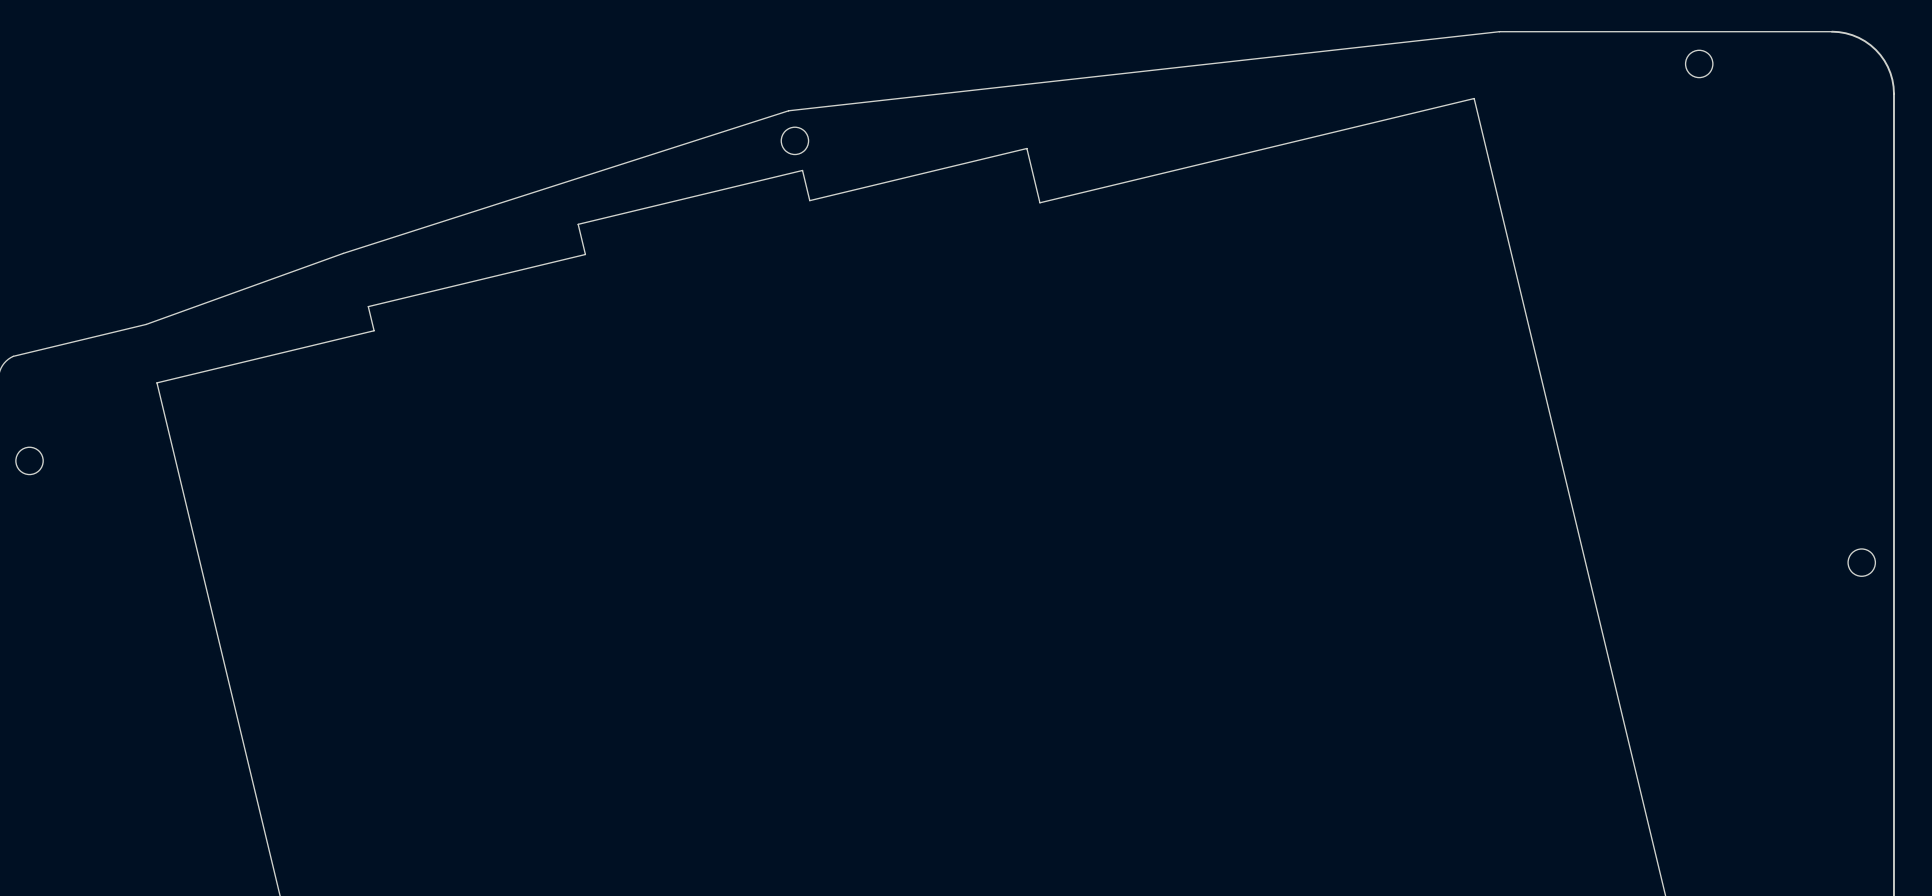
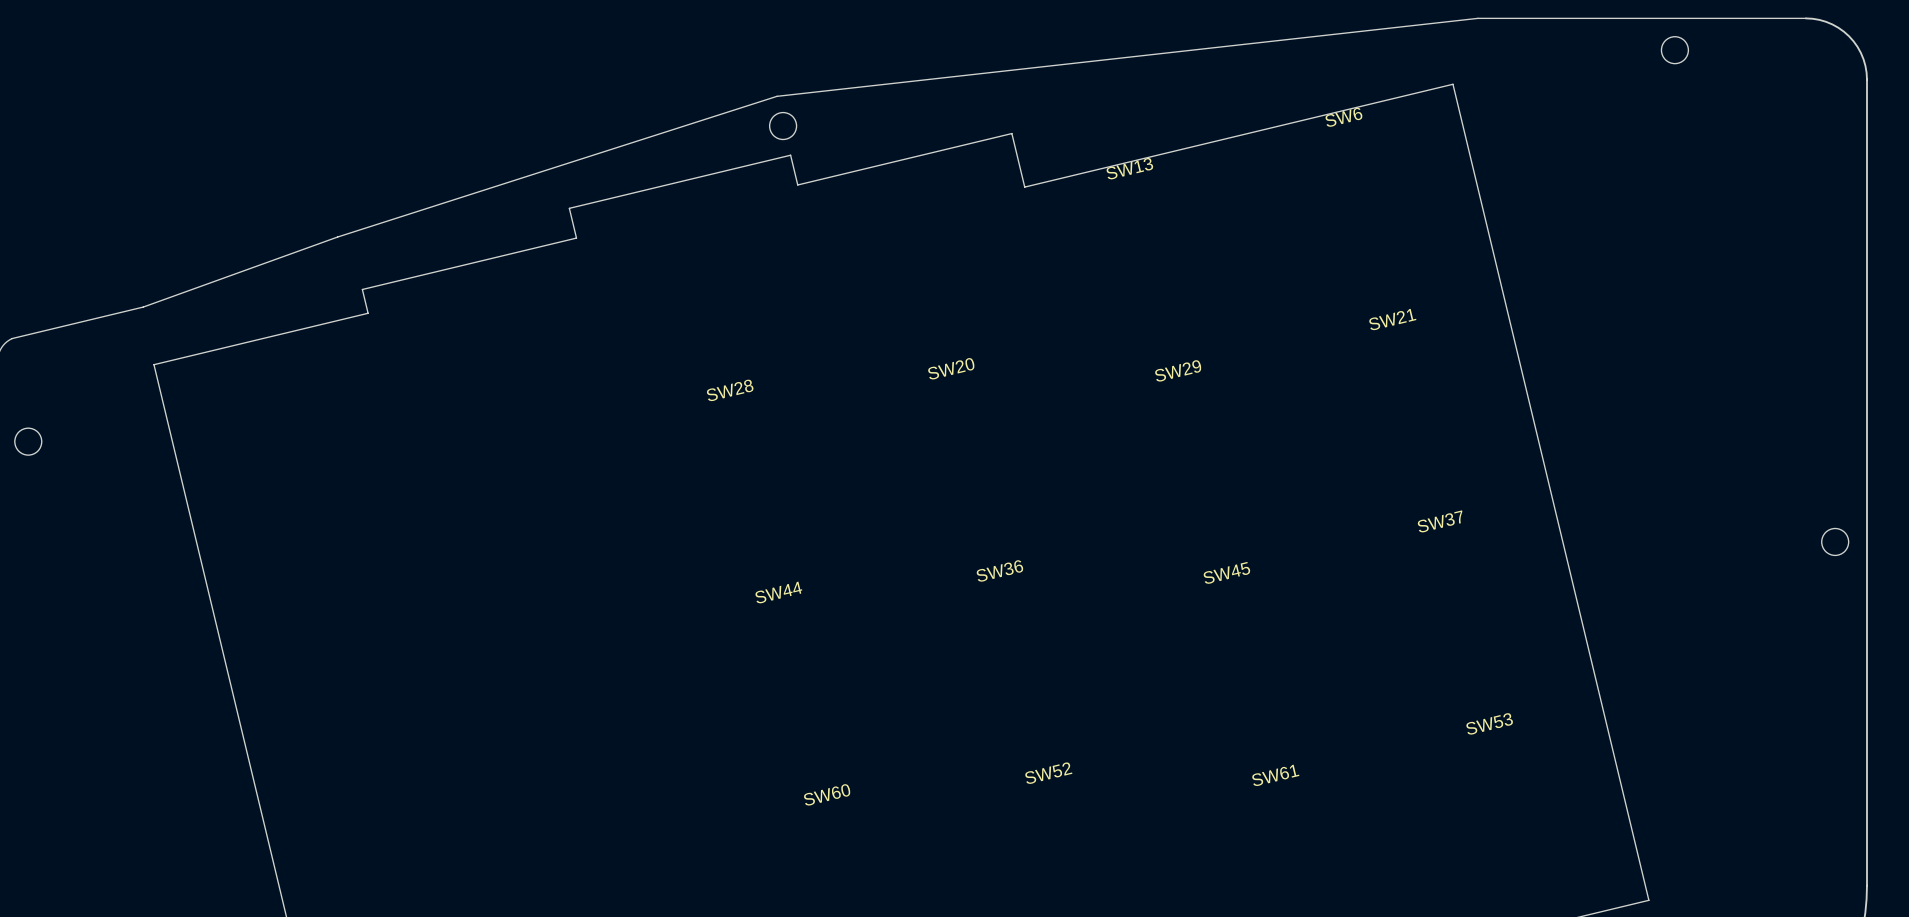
SW6: none -> (1343, 117)
SW13: none -> (1129, 168)
SW21: none -> (1392, 319)
SW20: none -> (951, 368)
SW29: none -> (1178, 371)
SW28: none -> (730, 390)
SW37: none -> (1439, 521)
SW36: none -> (999, 571)
SW45: none -> (1226, 573)
SW44: none -> (778, 592)
SW53: none -> (1489, 724)
SW52: none -> (1048, 773)
SW61: none -> (1275, 775)
SW60: none -> (827, 795)

